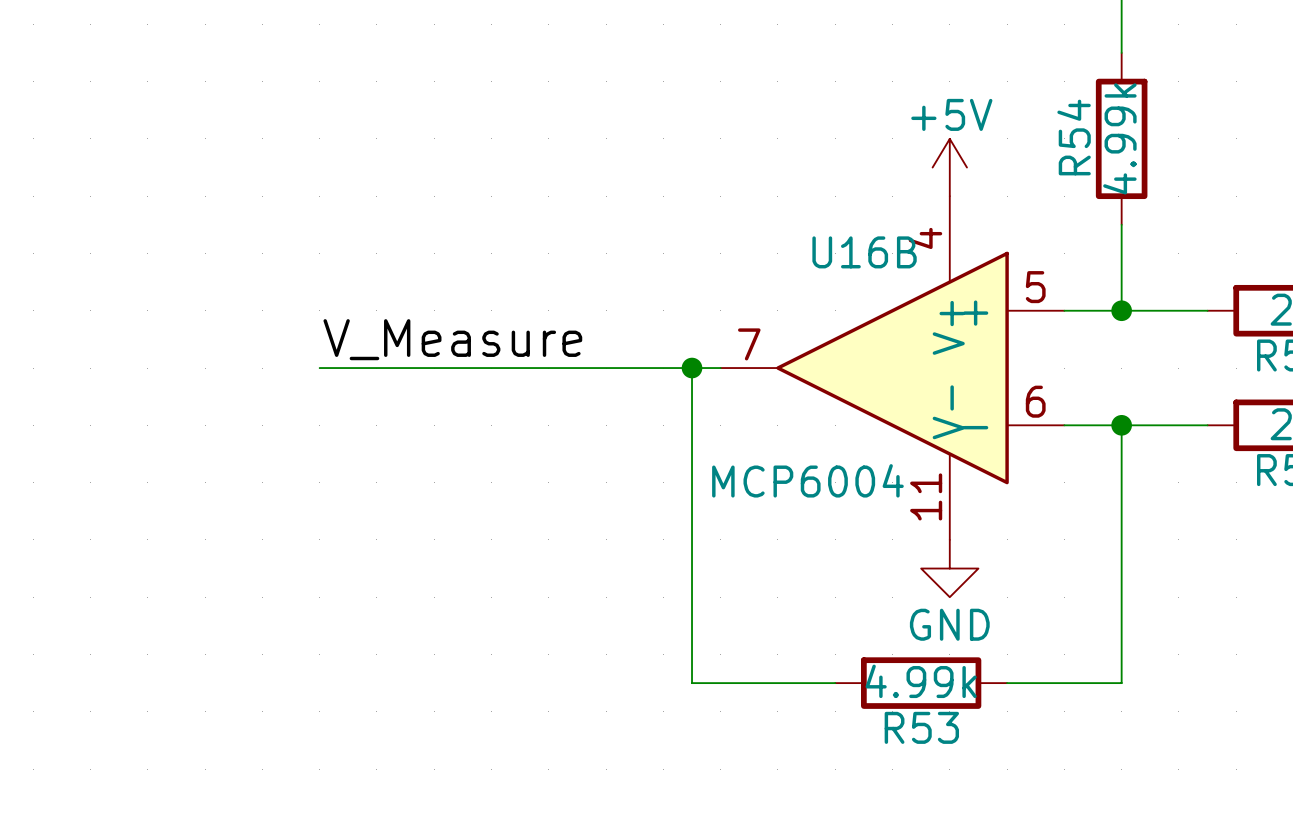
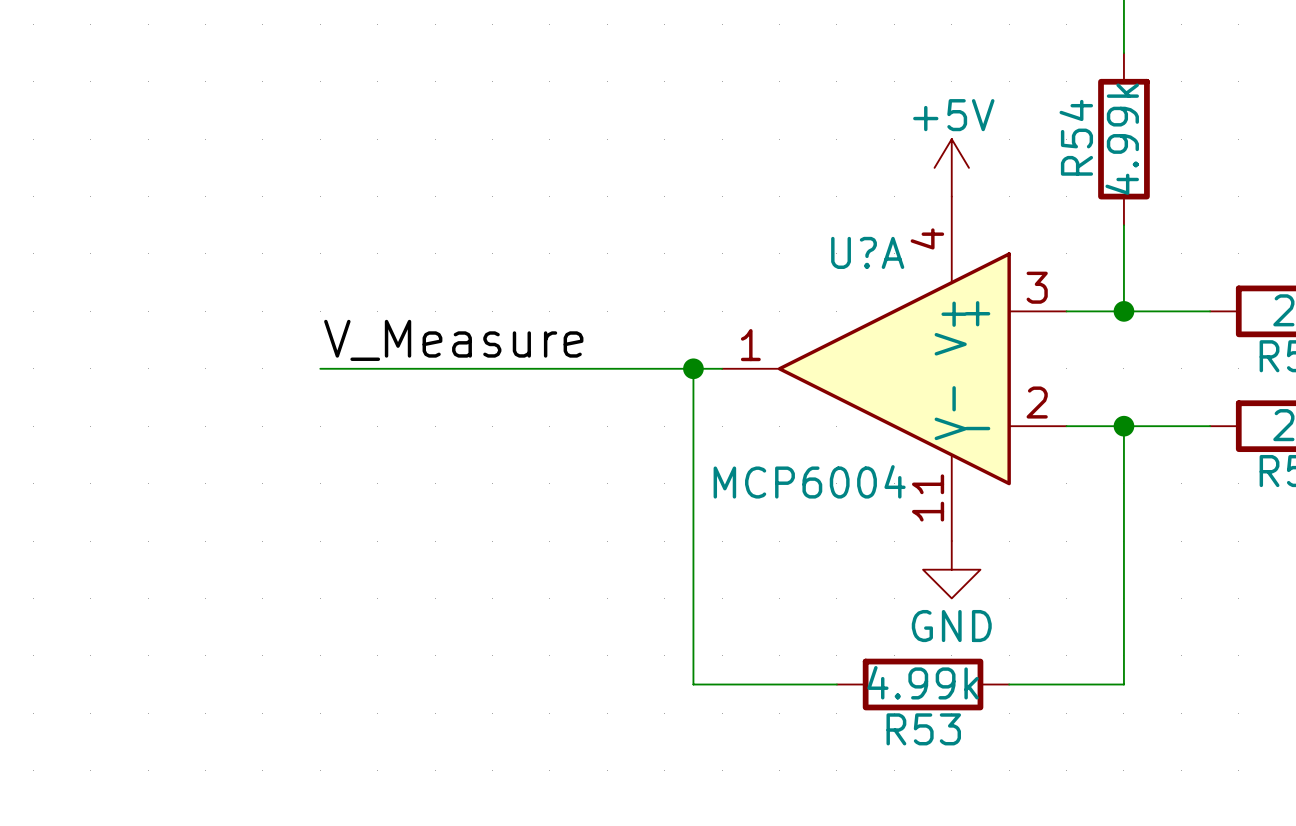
U16B name: U16B (864, 252) -> U?A (867, 252)
U16B pin number: 5 (1035, 287) -> 3 (1037, 287)
U16B pin number: 7 (749, 344) -> 1 (750, 345)
U16B pin number: 6 (1035, 401) -> 2 (1037, 402)

